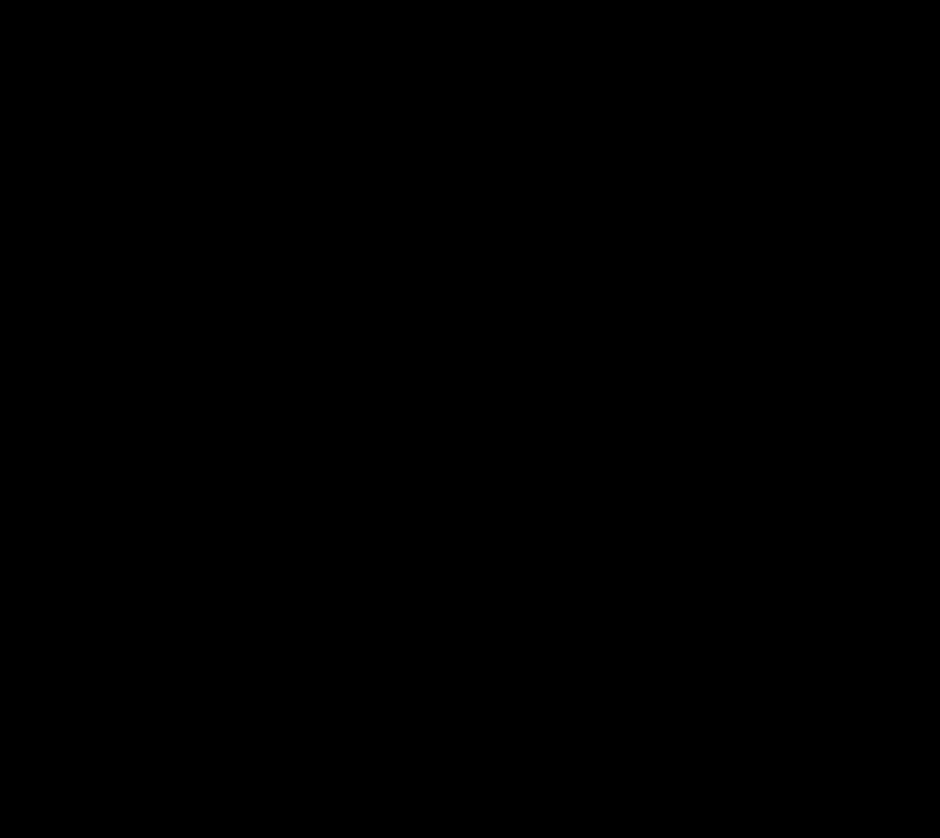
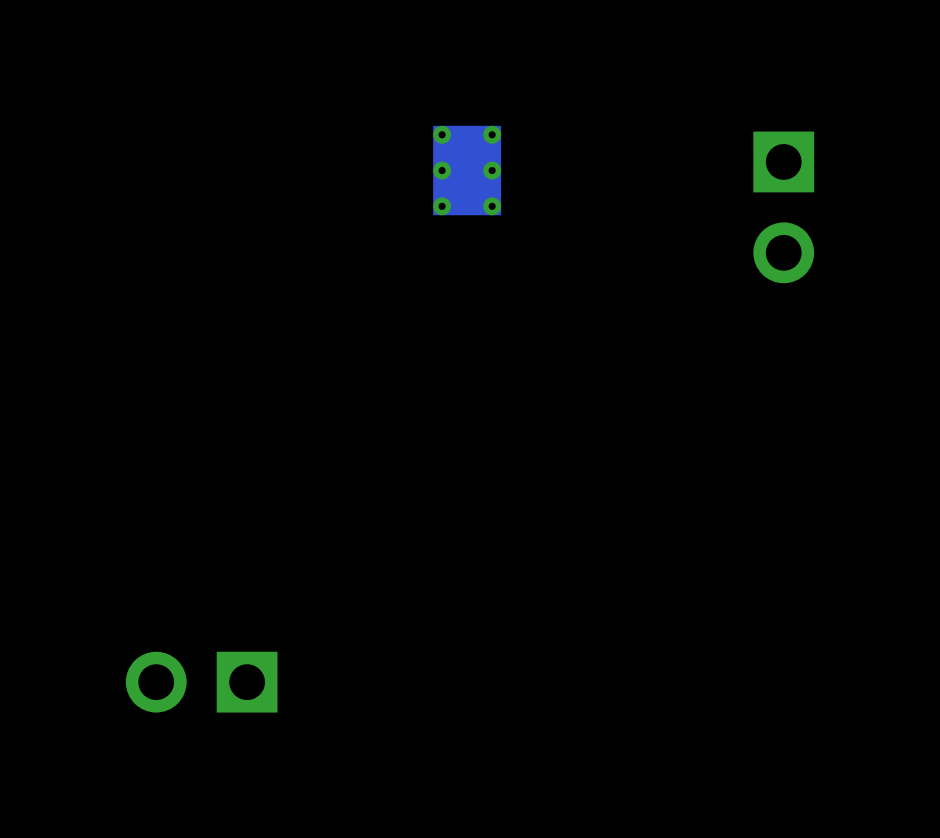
part: none -> (467, 170)
part: none -> (783, 207)
part: none -> (201, 682)

